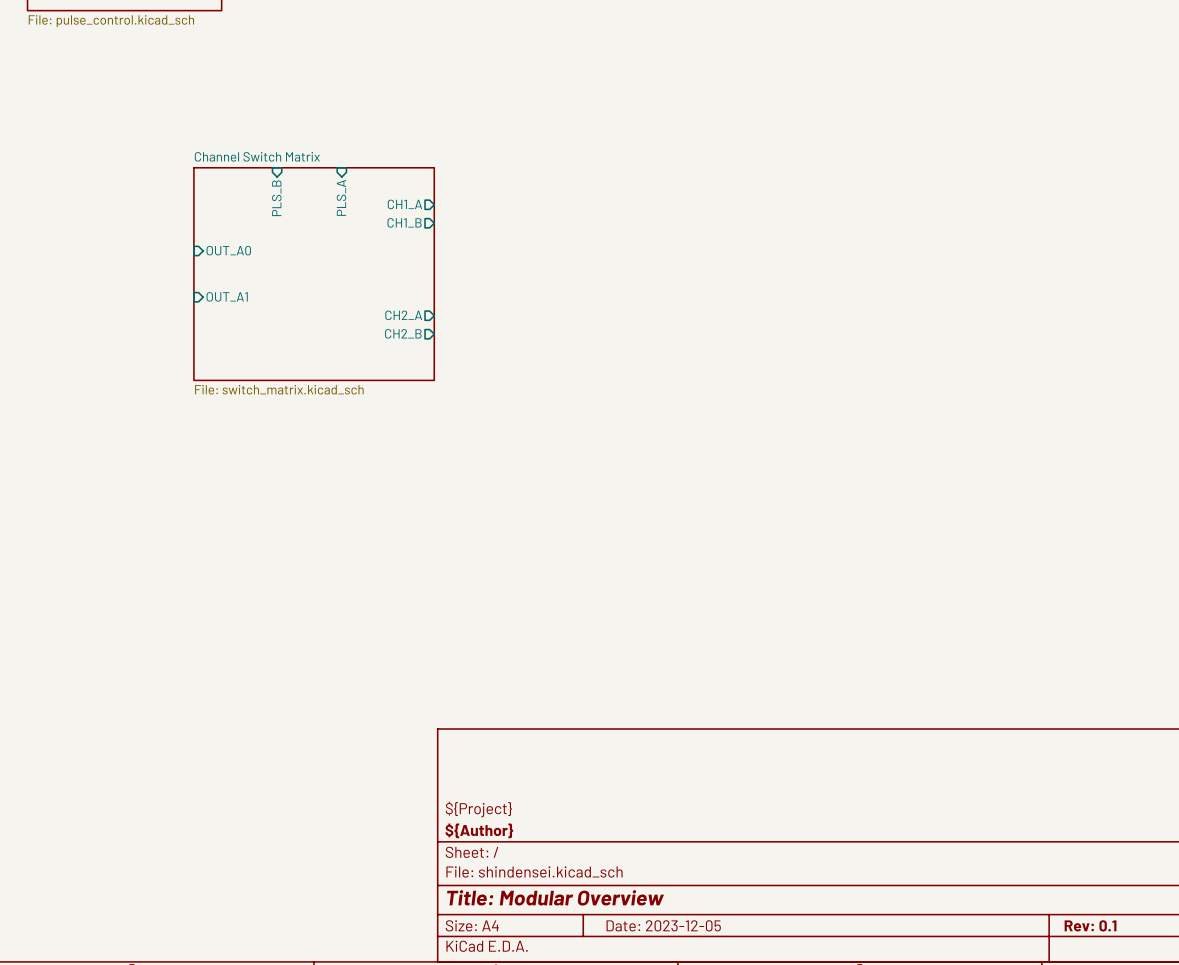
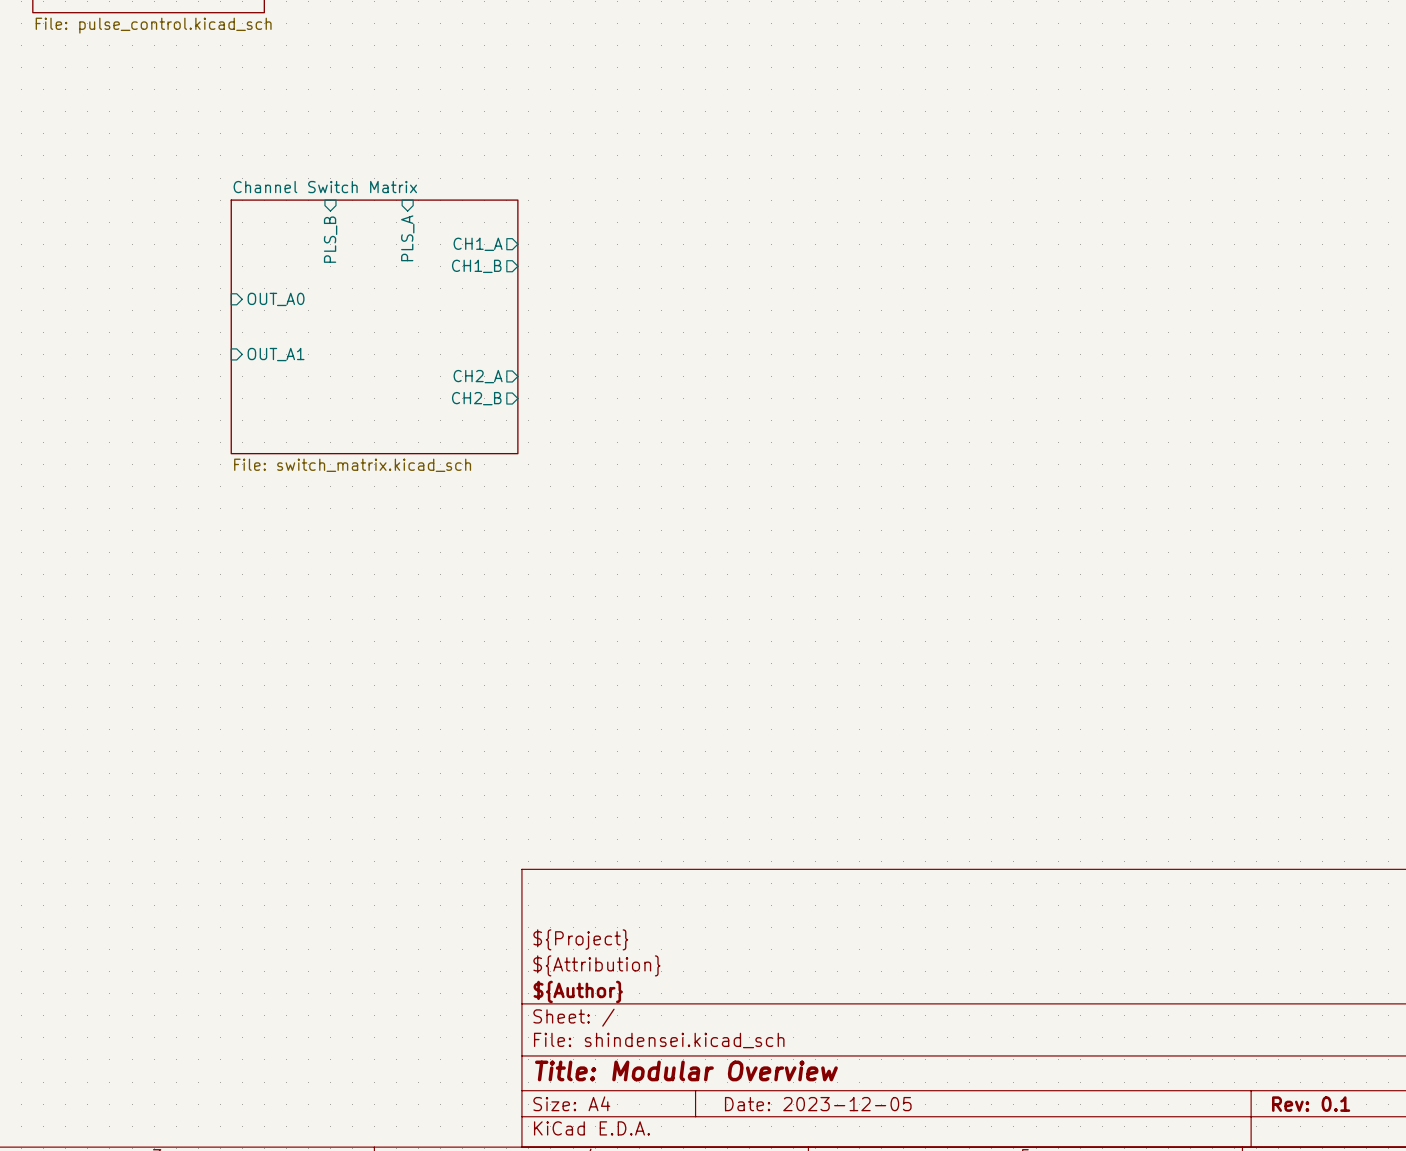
title block: none -> ${Project} (580, 939)
title block: ${Project} (478, 809) -> ${Attribution} (596, 965)

